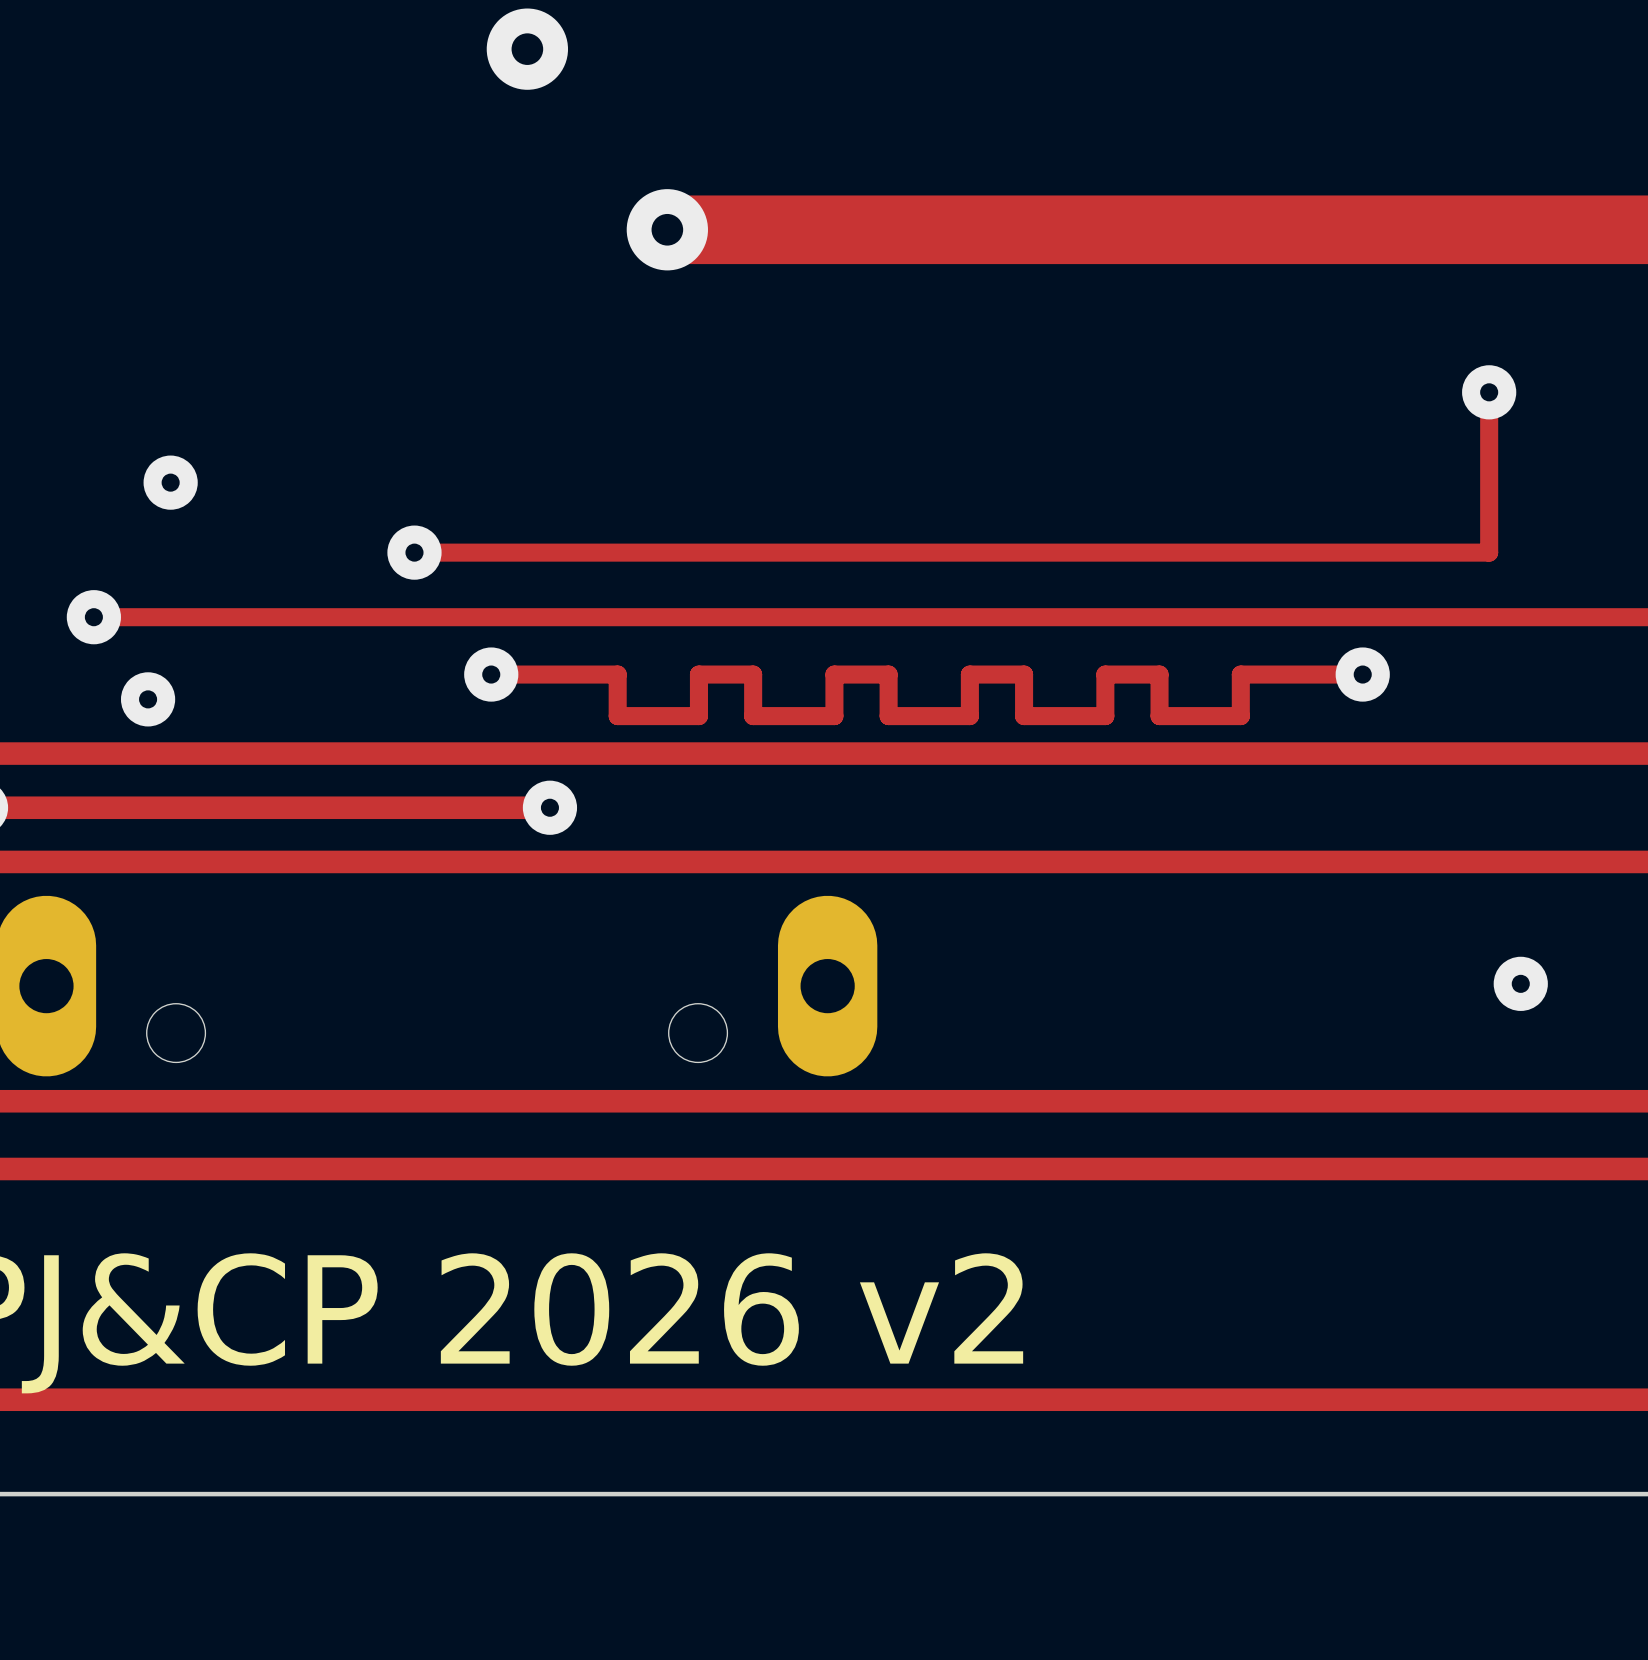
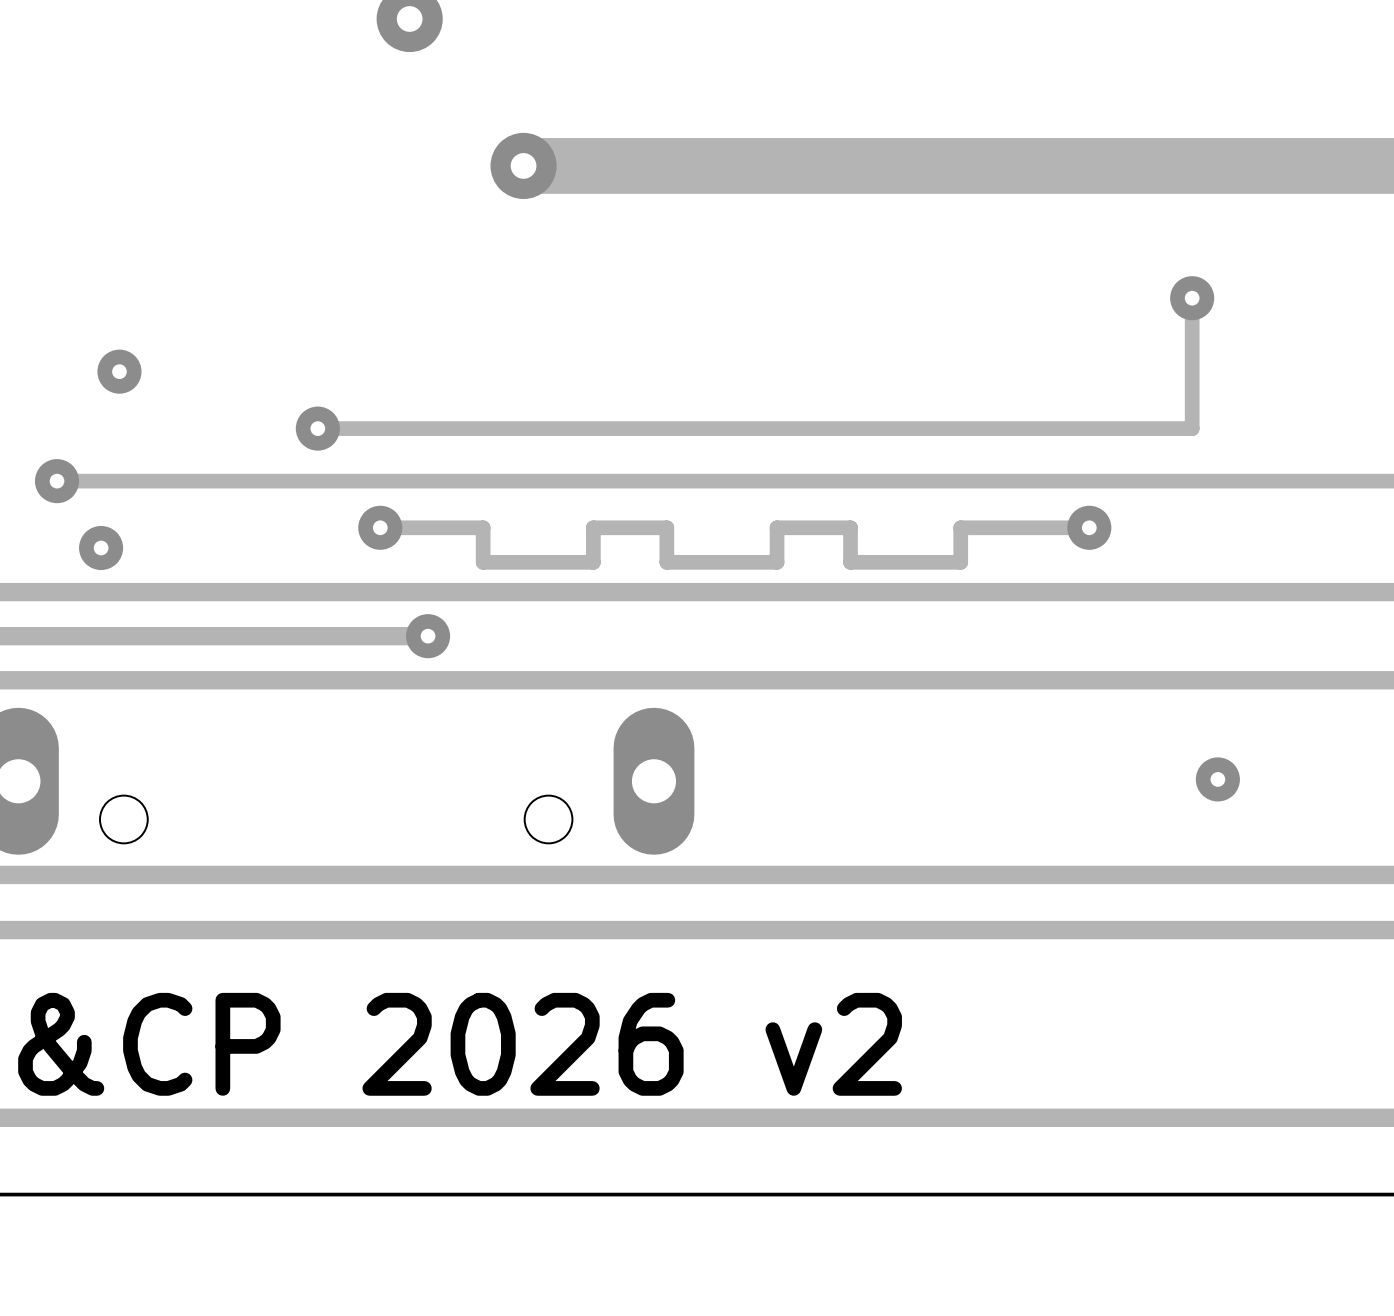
track: (753, 674) (698, 674) (698, 716) (617, 716) -> (593, 562) (483, 562)
track: (834, 674) (834, 716) (753, 716) -> (659, 527) (593, 527)
track: (843, 674) (888, 674) (888, 716) (969, 716) (969, 674) (978, 674) -> (666, 527) (666, 562) (777, 562) (777, 527)
track: (1024, 674) (1024, 716) (1105, 716) (1105, 674) (1159, 674) (1159, 716) (1240, 716) (1240, 674) -> (813, 527) (850, 527) (850, 562) (960, 562) (960, 527) (990, 527)

